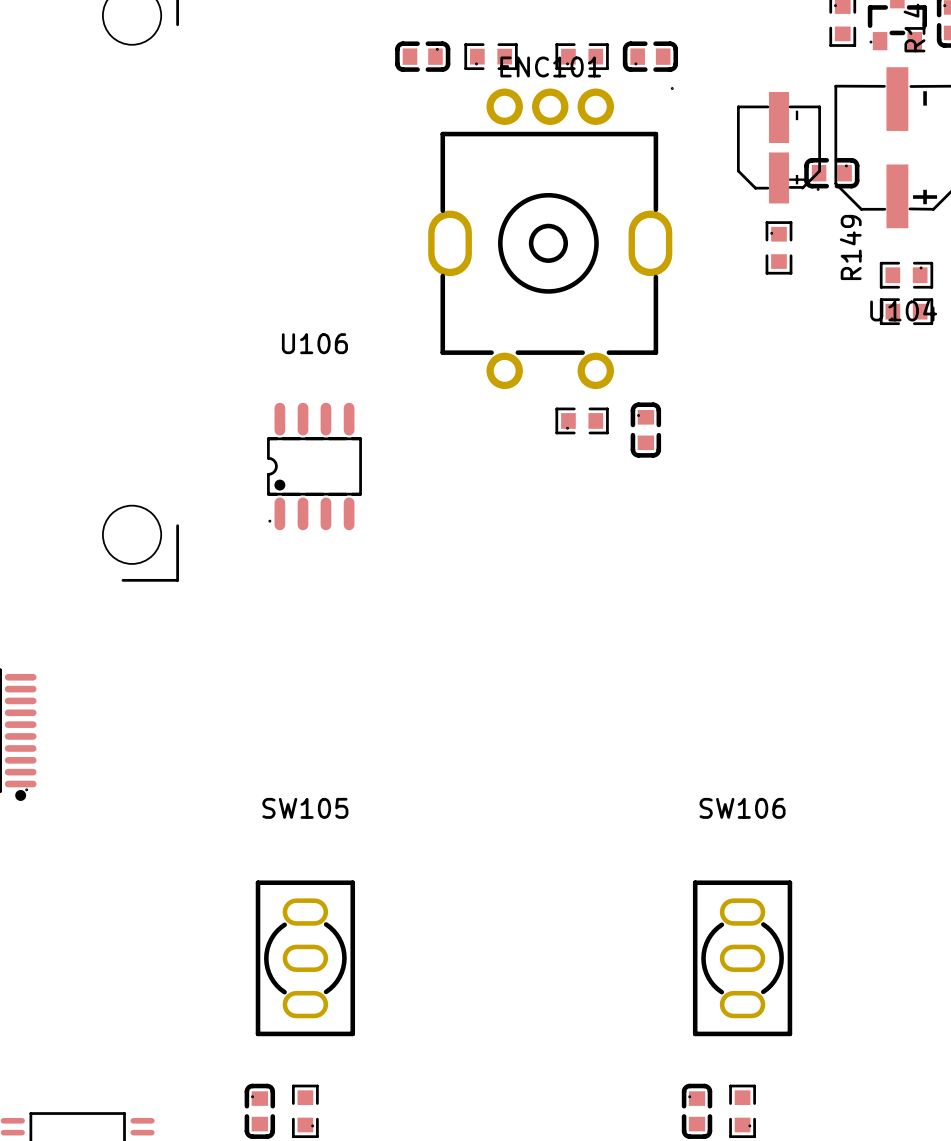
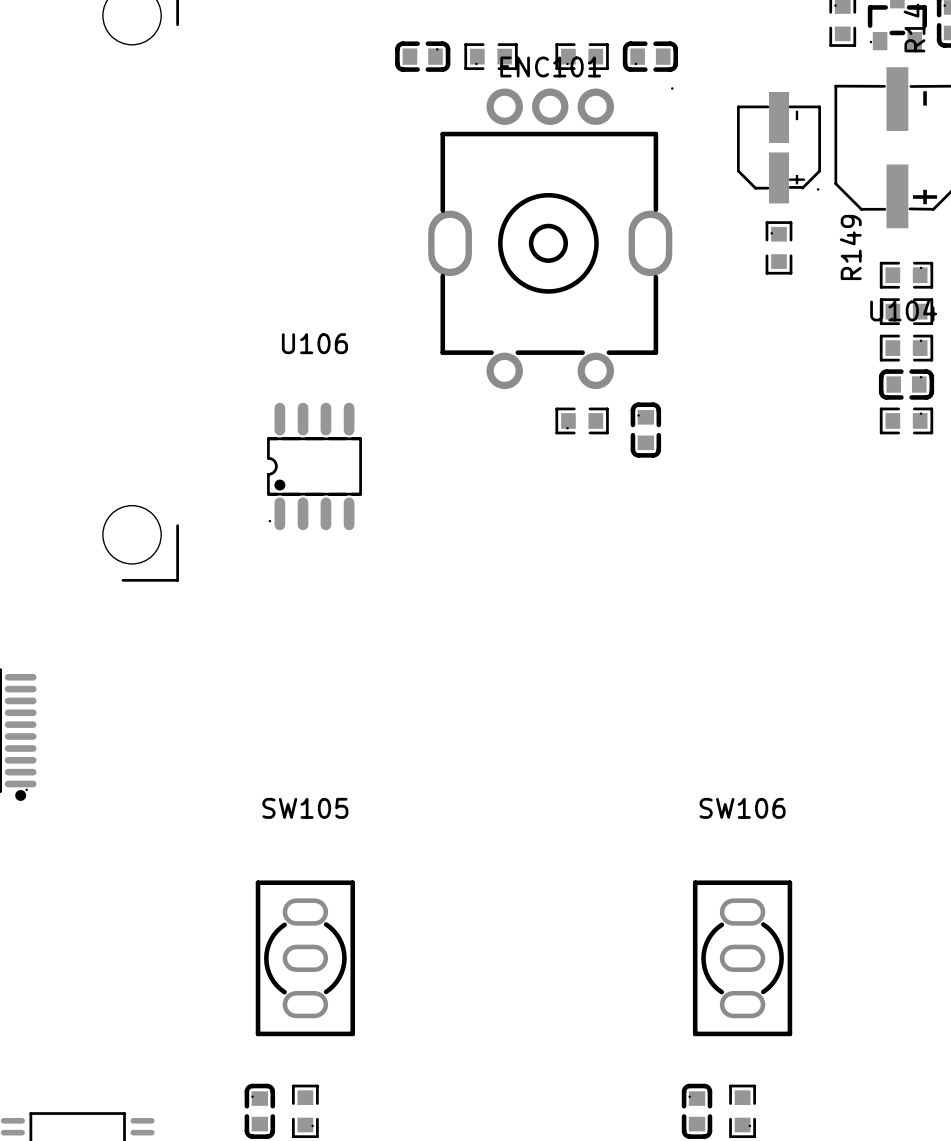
part: (831, 173) -> none
part: none -> (906, 348)
part: none -> (906, 384)
part: none -> (906, 420)

